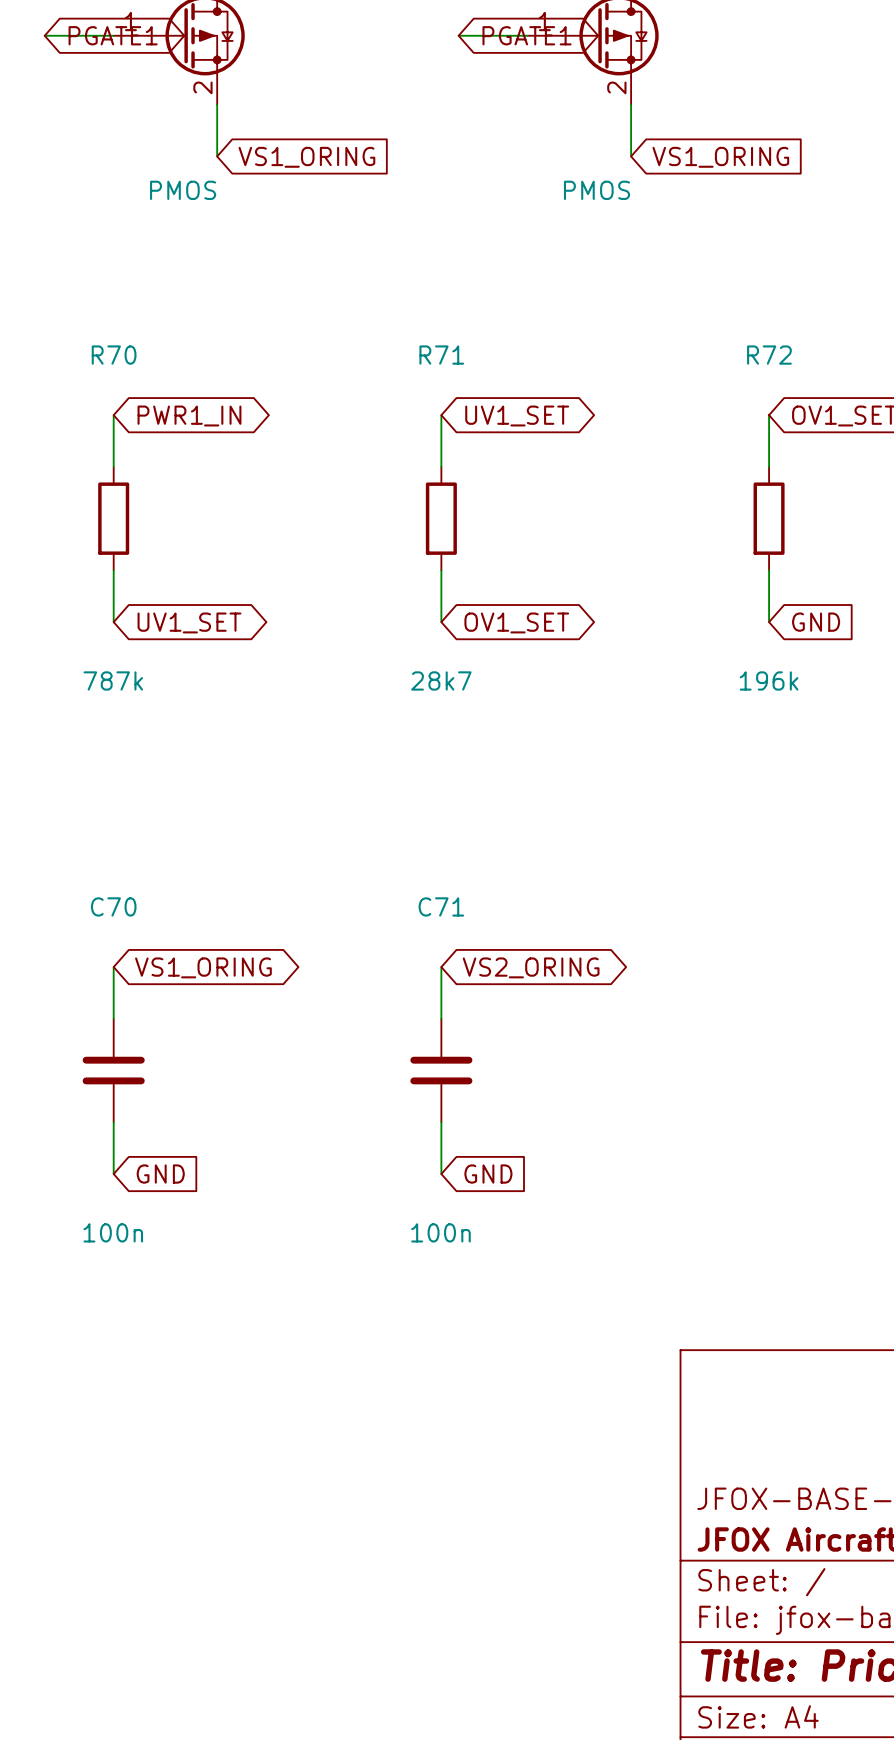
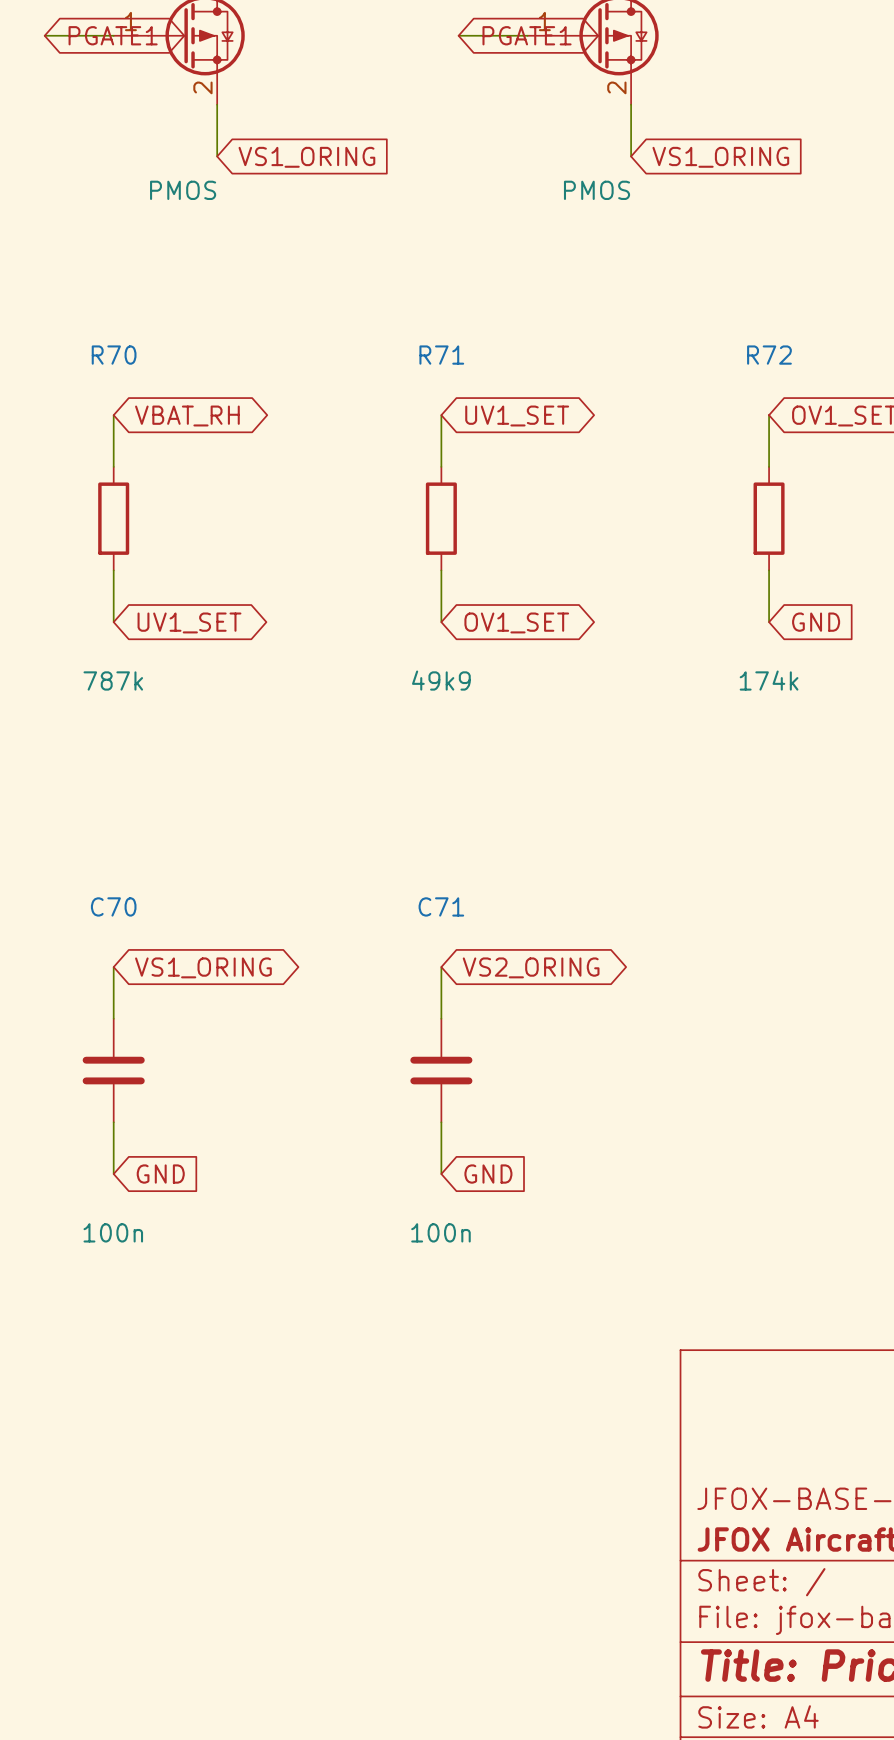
global label: PWR1_IN (189, 416) -> VBAT_RH (187, 416)
R71 value: 28k7 (441, 680) -> 49k9 (441, 680)
R72 value: 196k (769, 680) -> 174k (769, 680)

